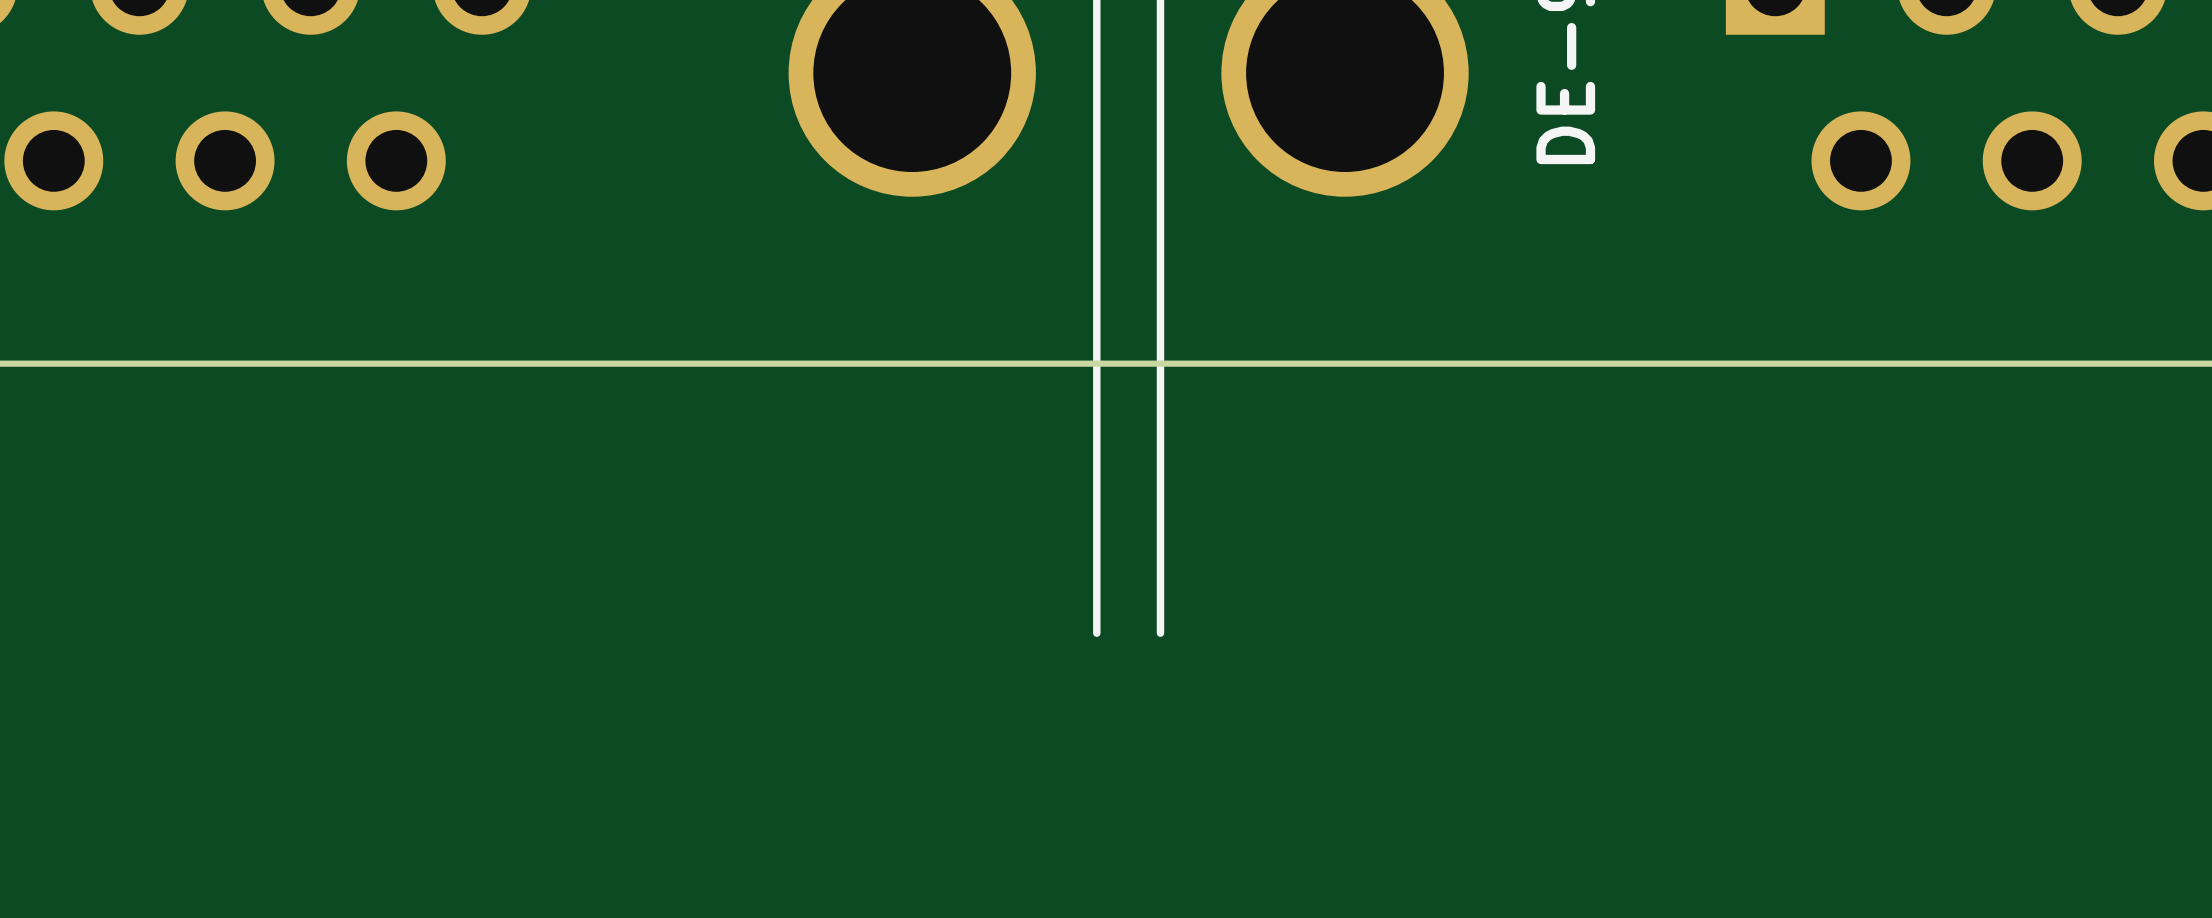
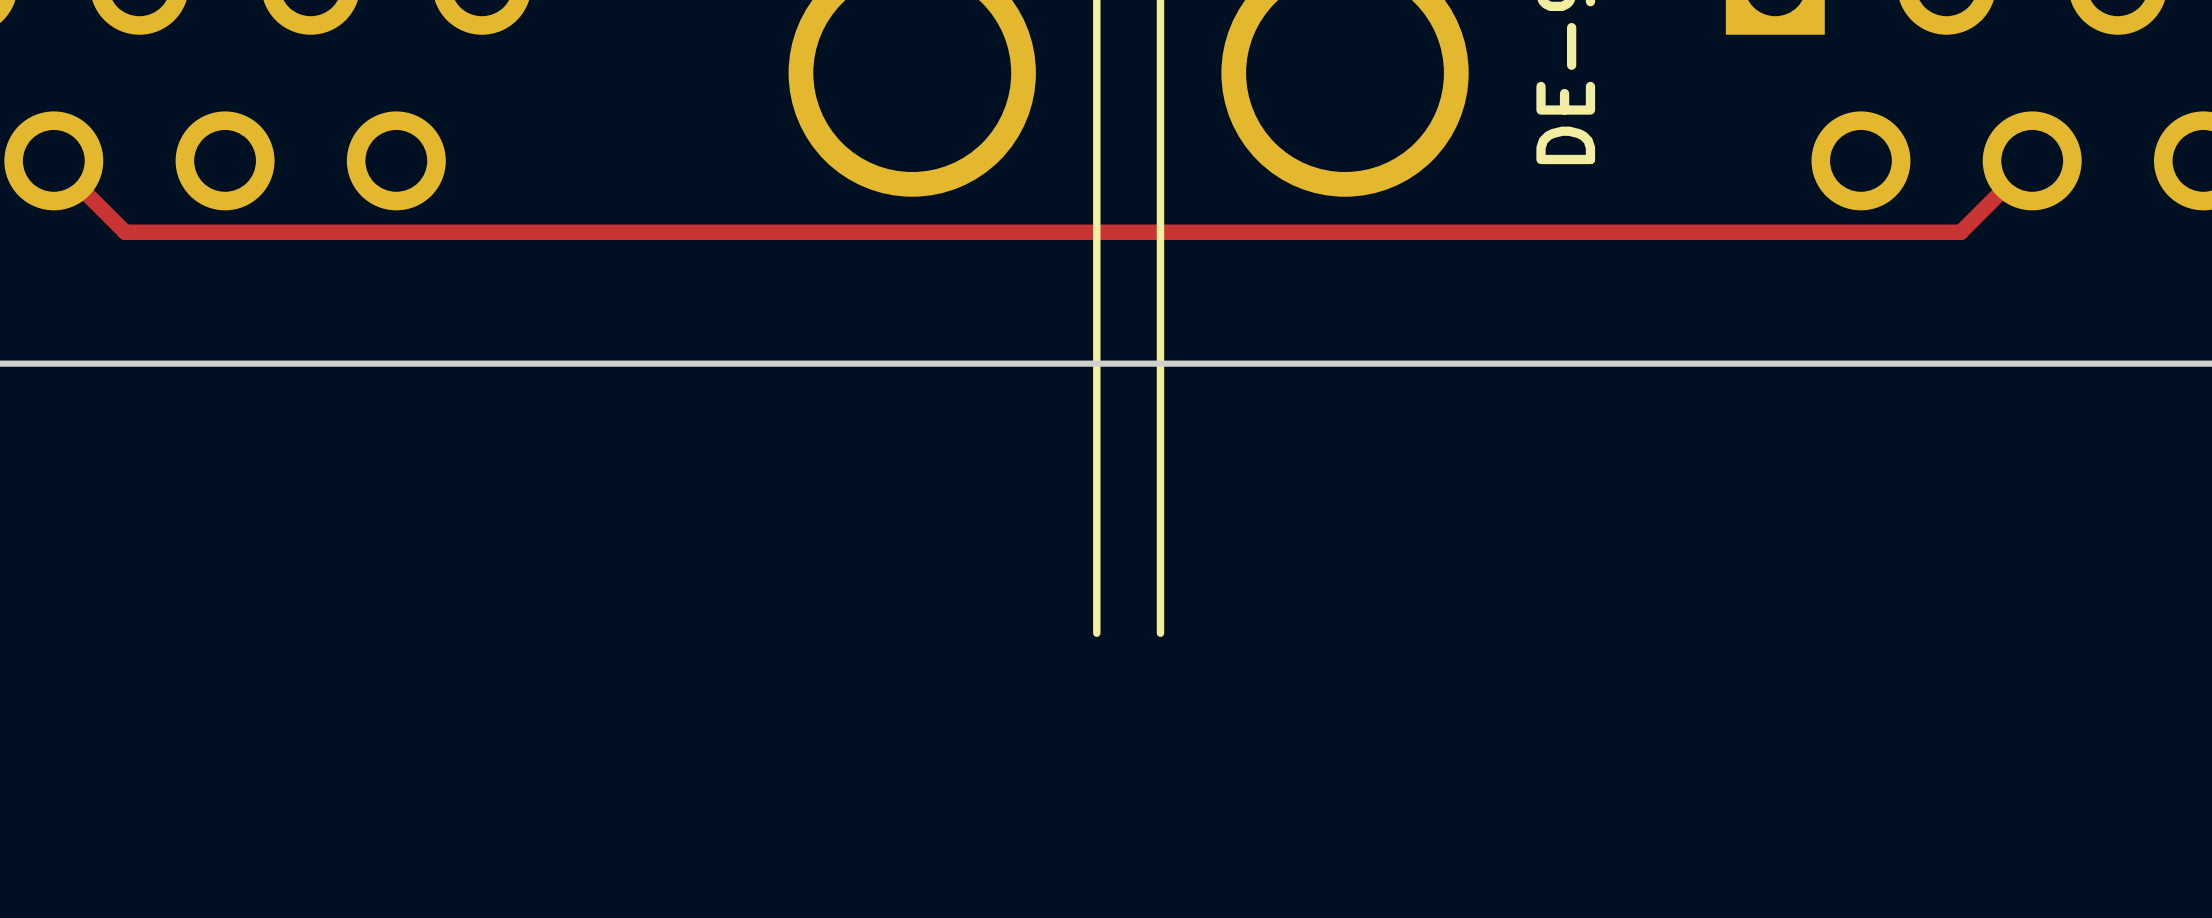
track: none -> (53, 160) (125, 232) (1960, 232) (2032, 160)

